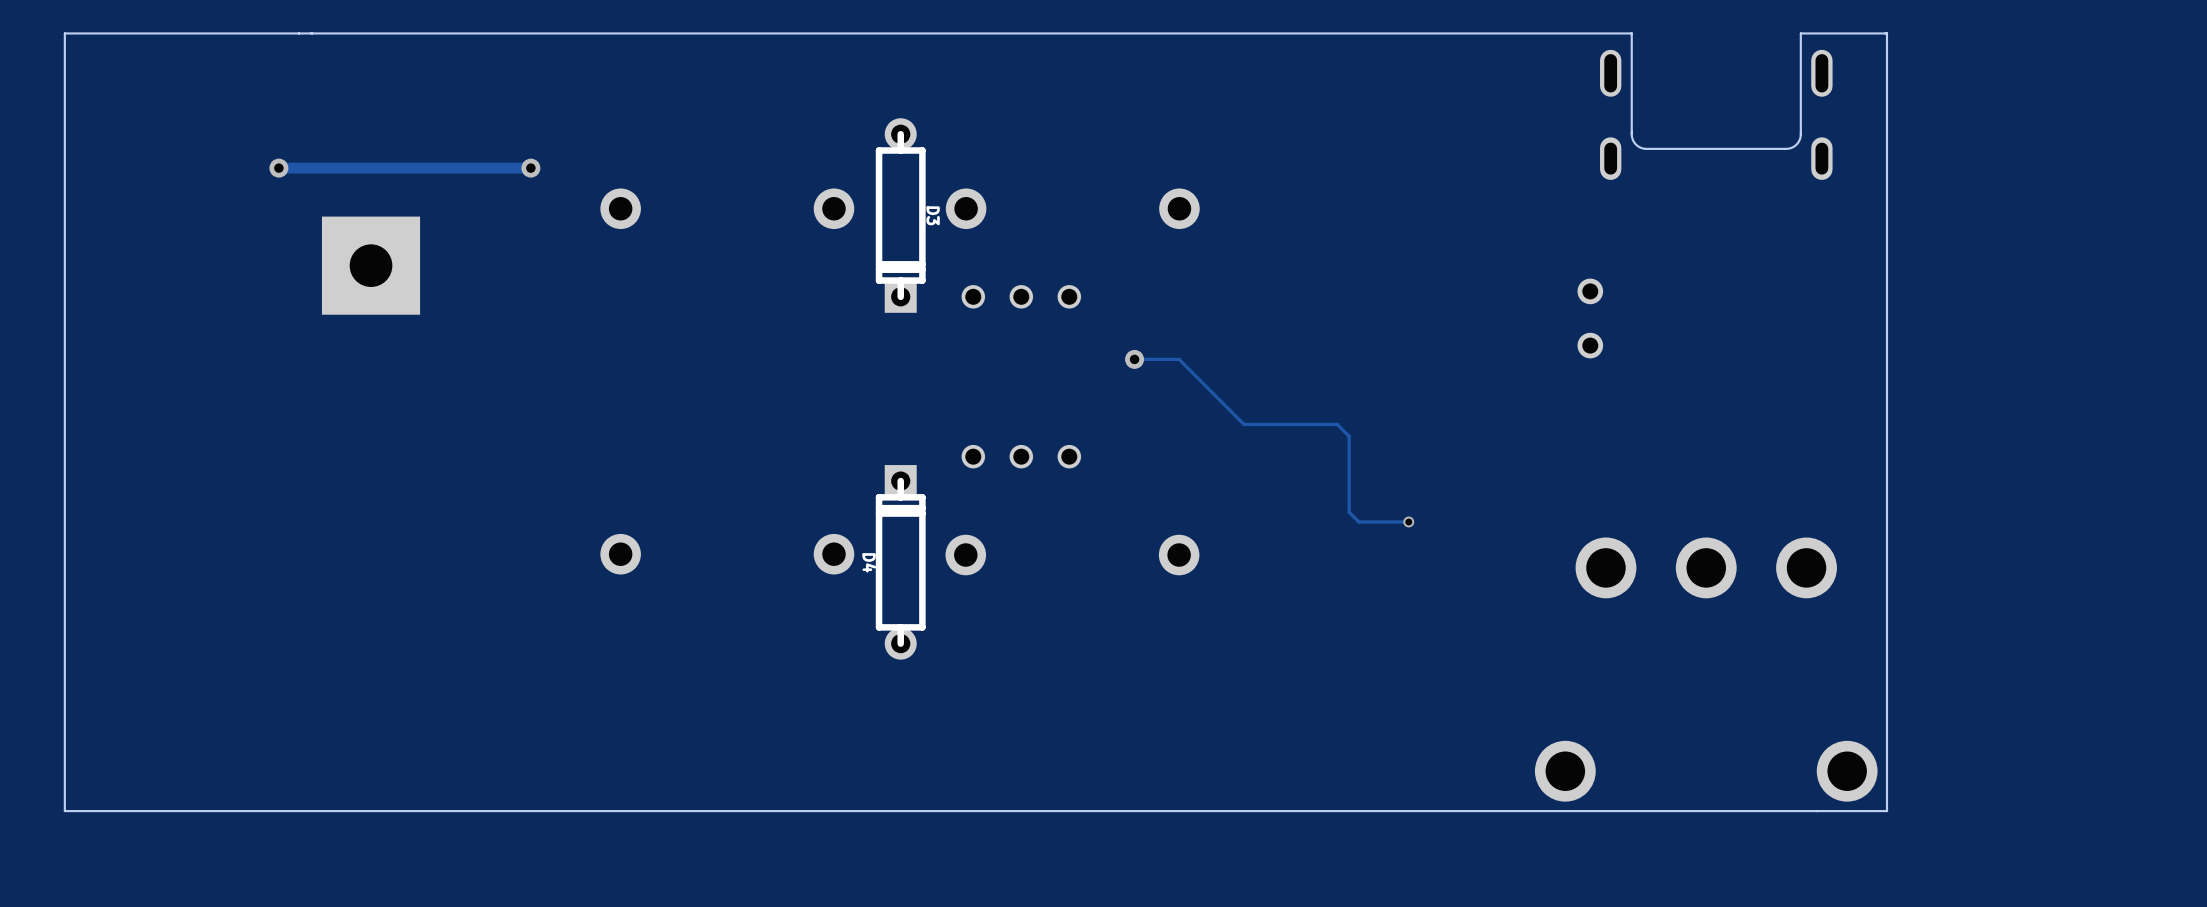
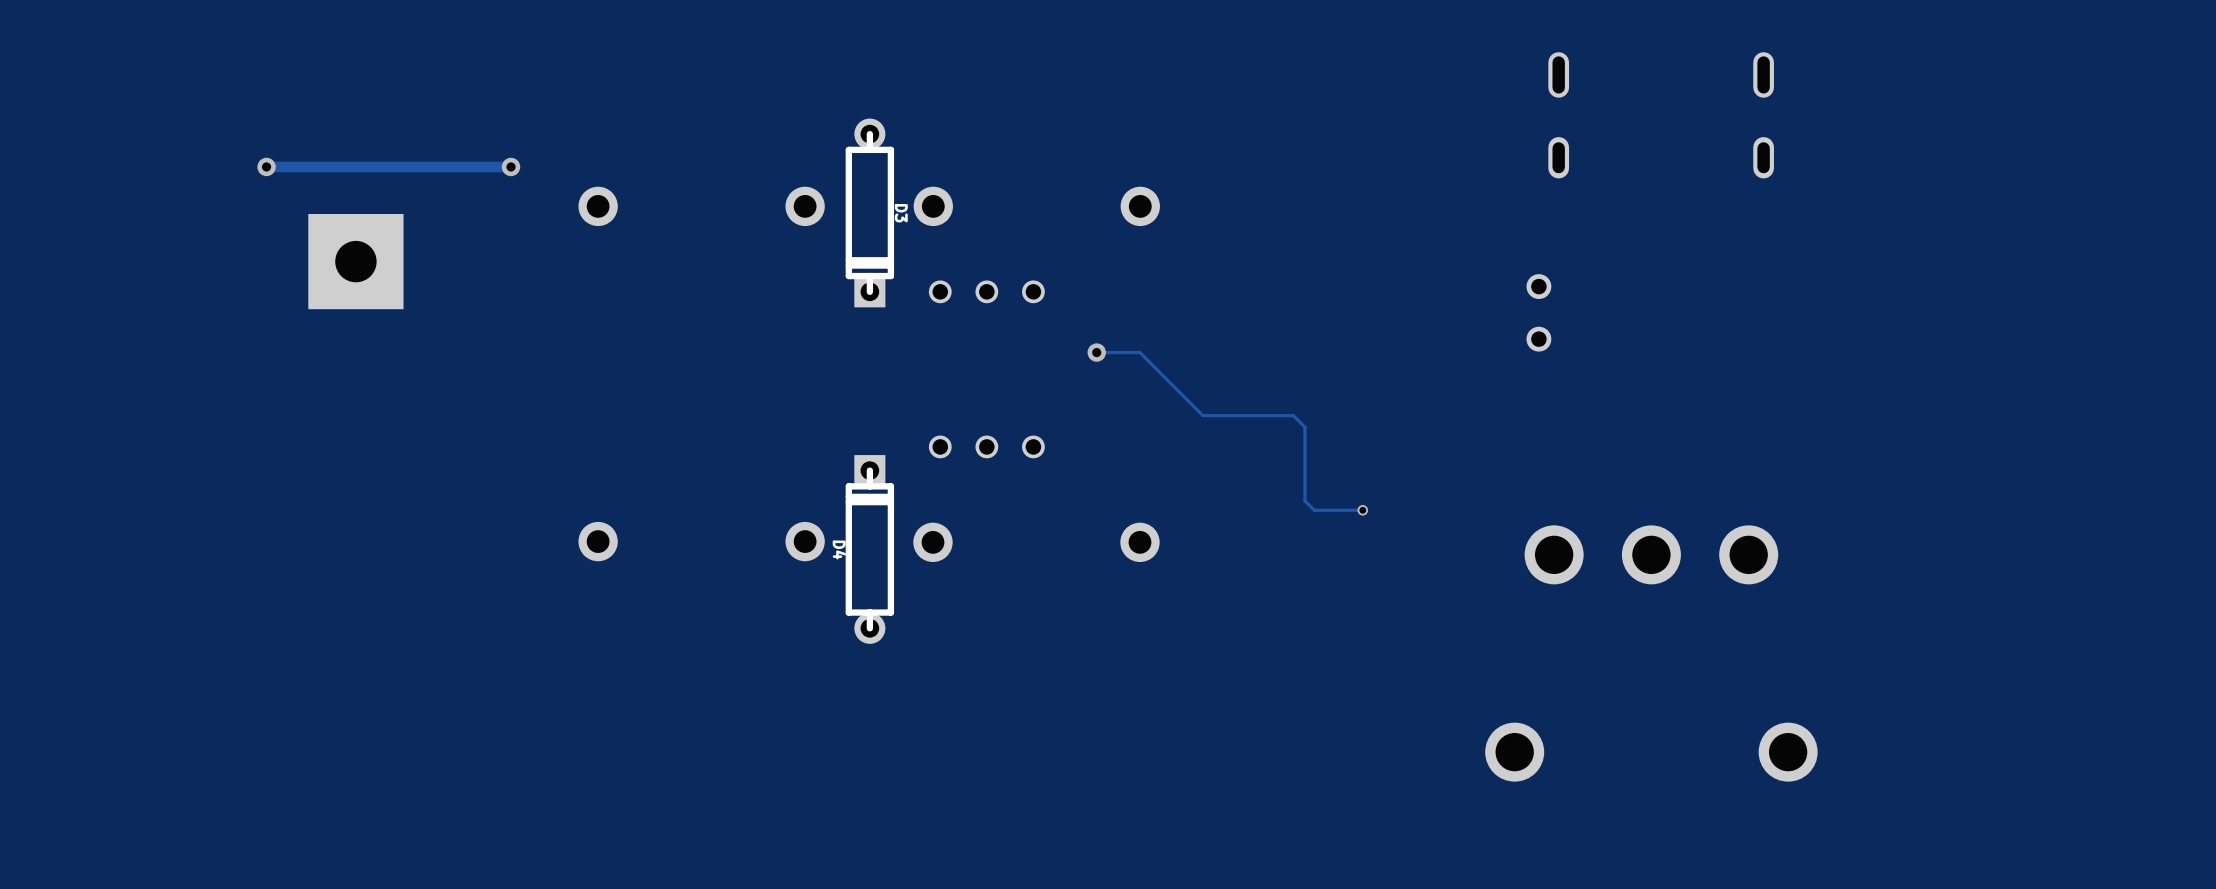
board edge: (1631, 133) (1635, 144) (1645, 148) (1785, 148) -> none
board edge: (1631, 133) (1631, 33) (64, 33) (64, 811) (1886, 811) (1886, 33) (1800, 33) (1800, 135) -> none
board edge: (1800, 134) (1796, 144) (1785, 148) -> none

